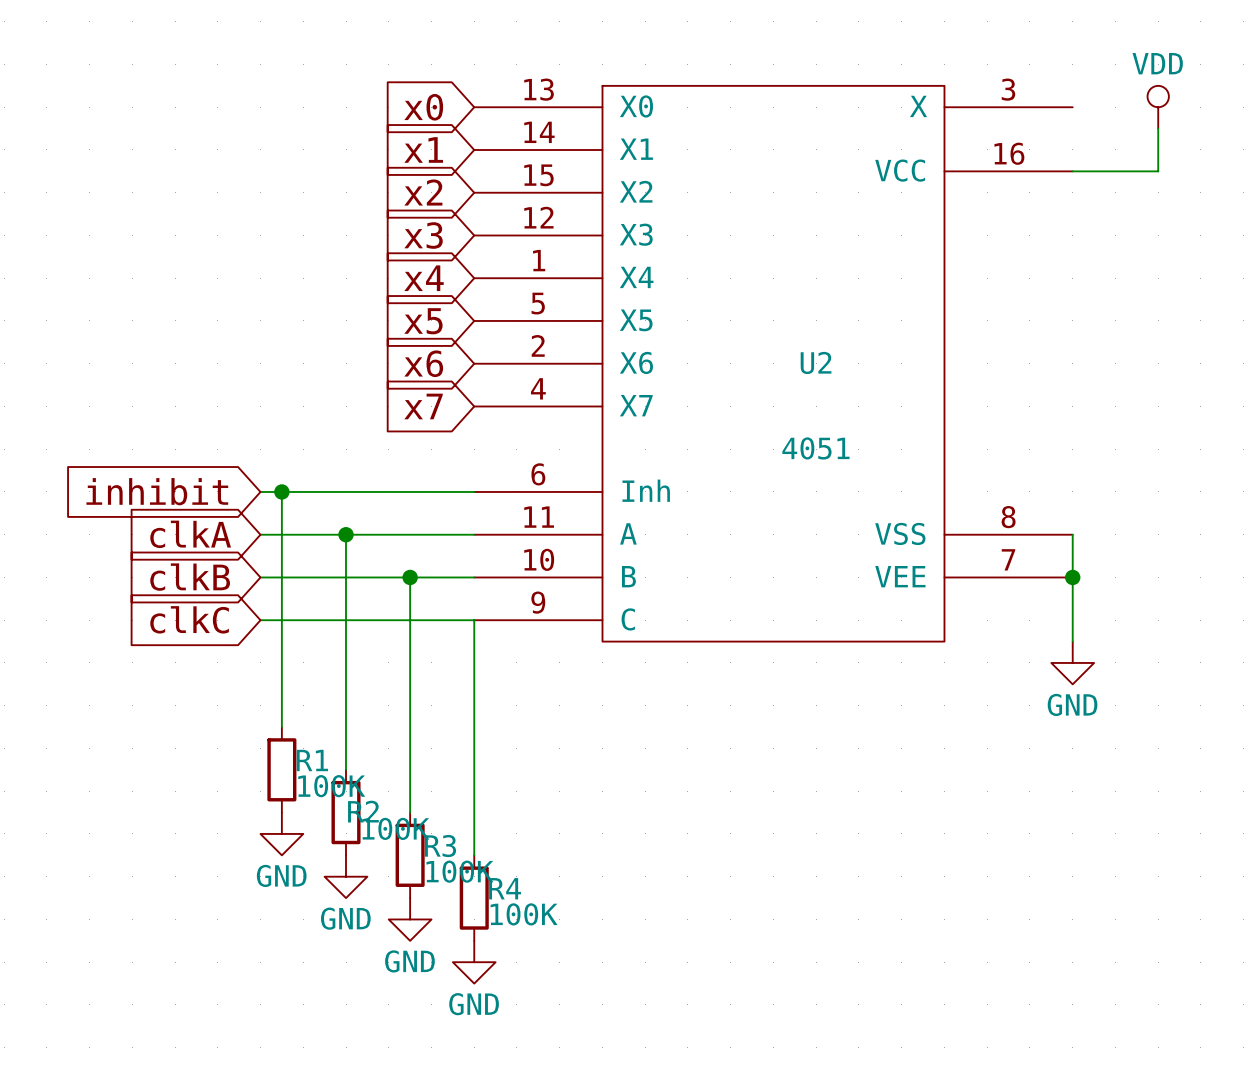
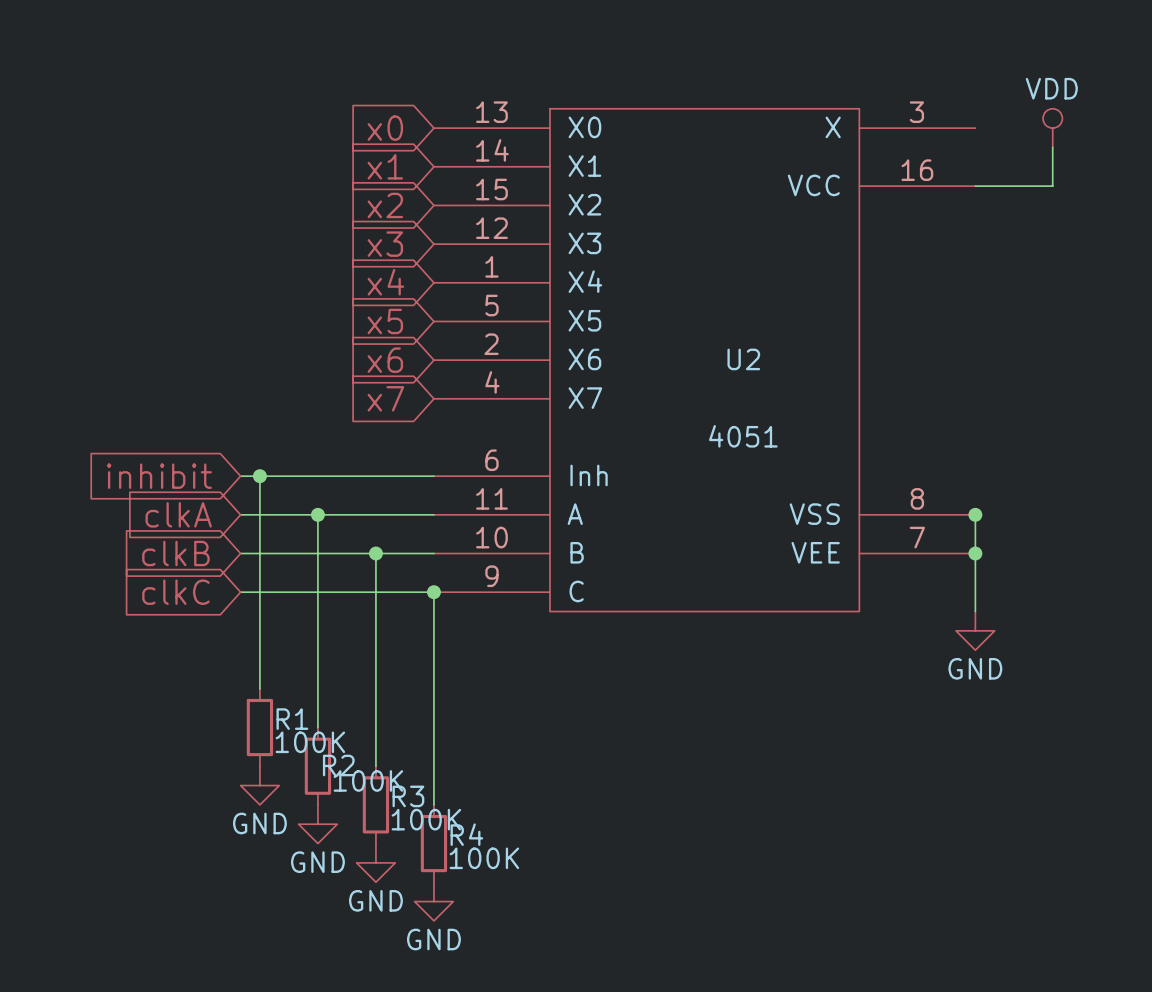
junction: none -> (975, 514)
junction: none -> (433, 592)

